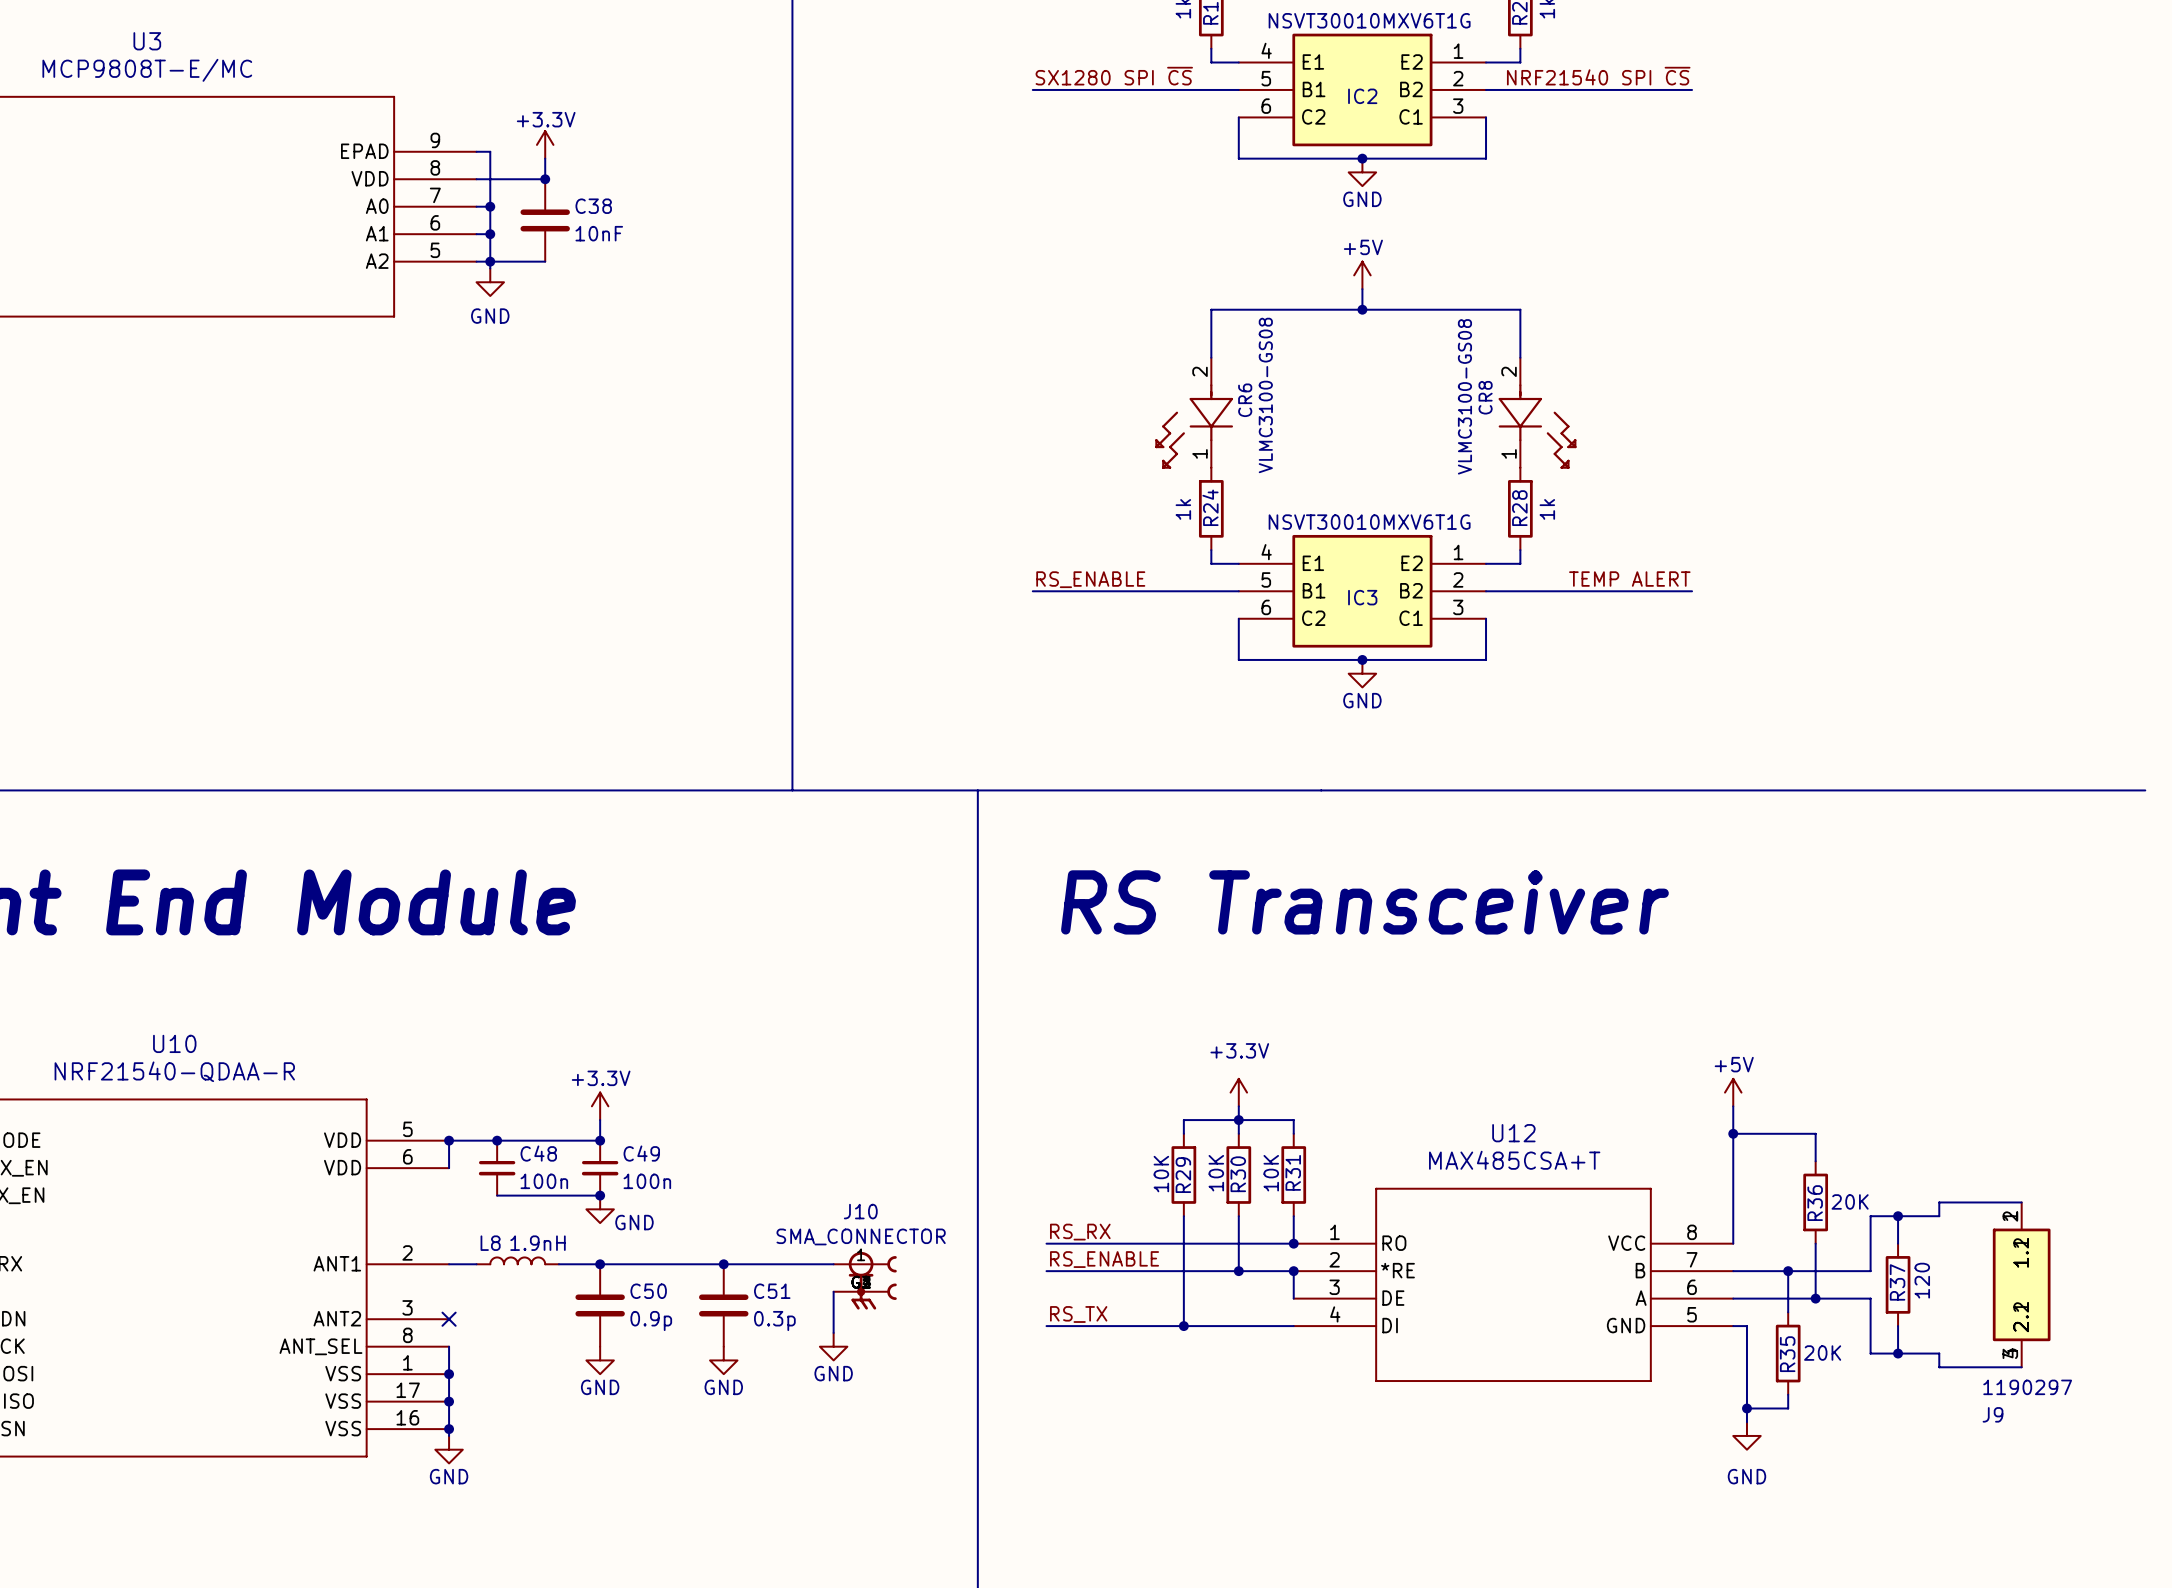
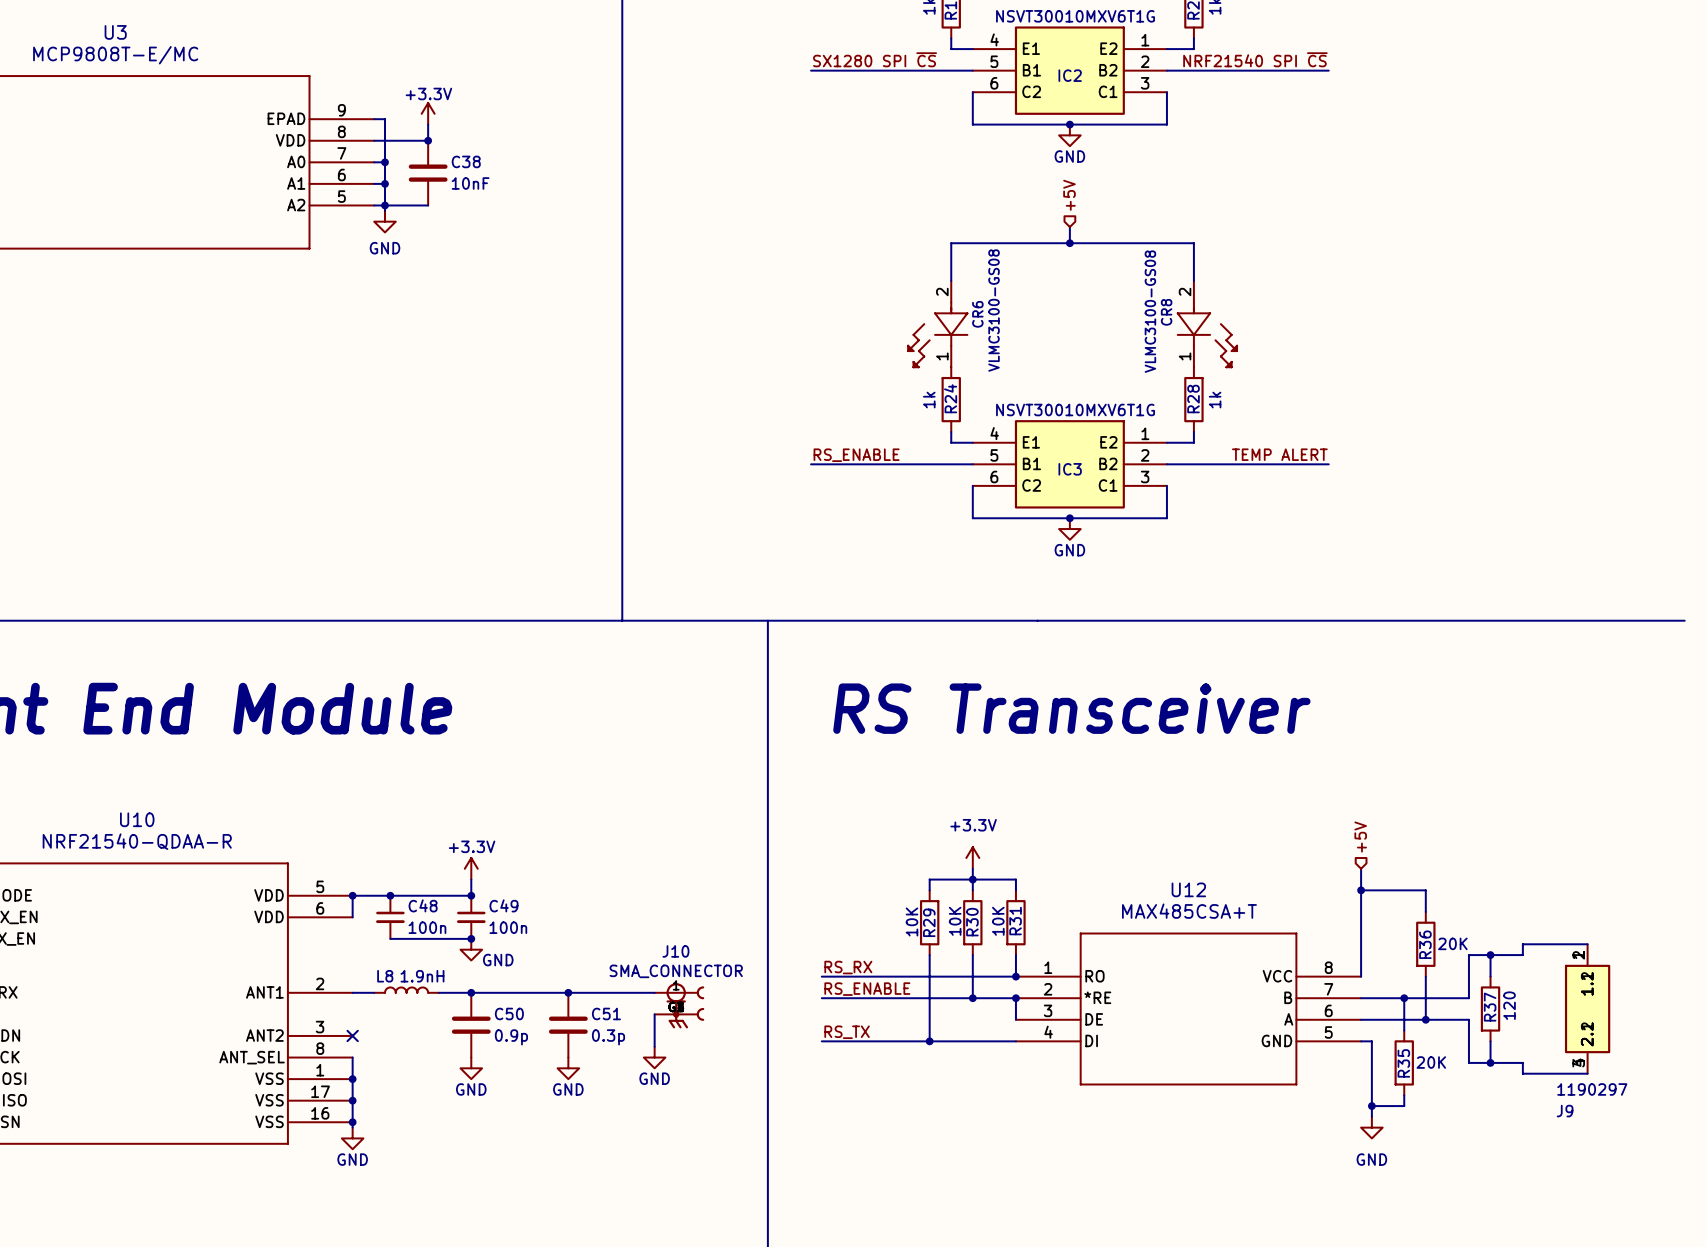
hierarchical label: none -> +5V (1069, 195)
power symbol: +5V (1362, 275) -> none
hierarchical label: none -> +5V (1360, 837)
power symbol: +5V (1733, 1092) -> none

